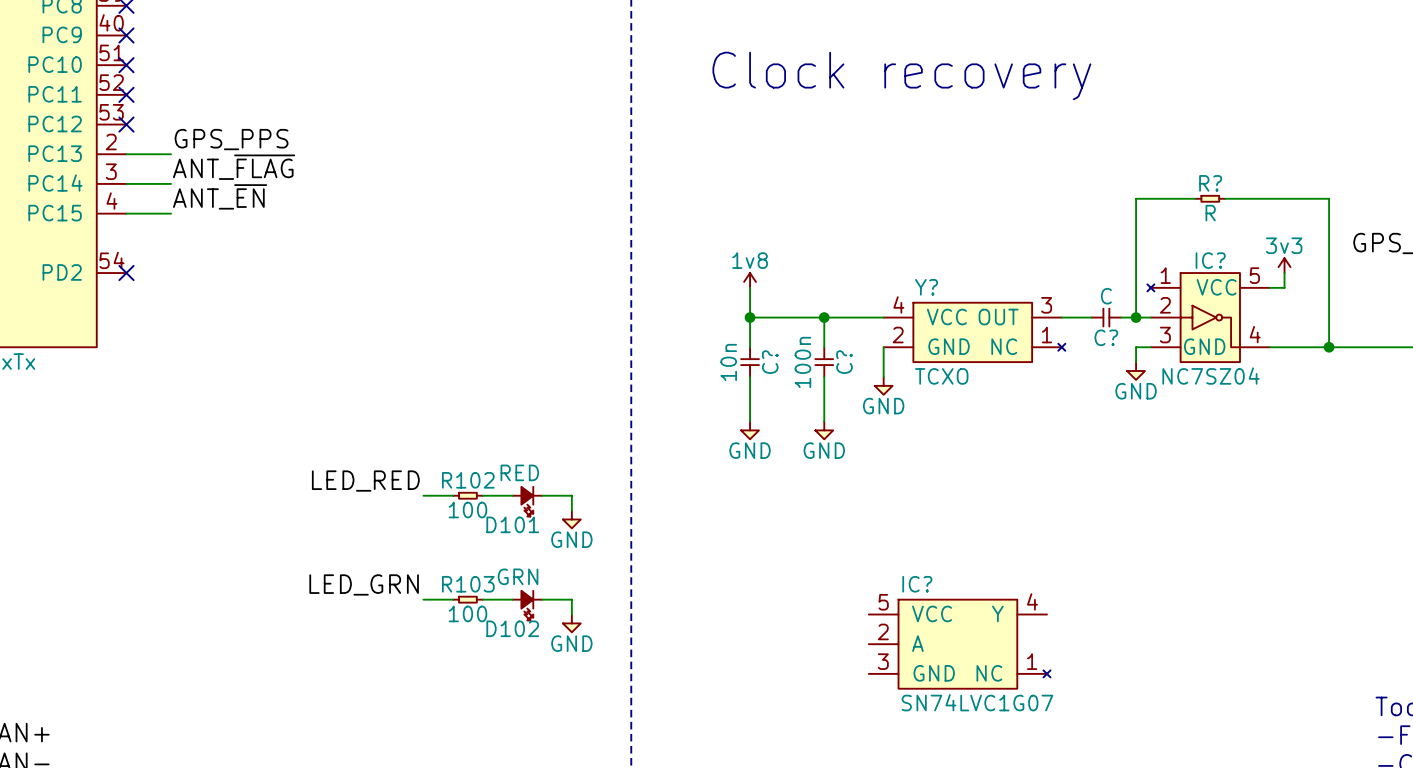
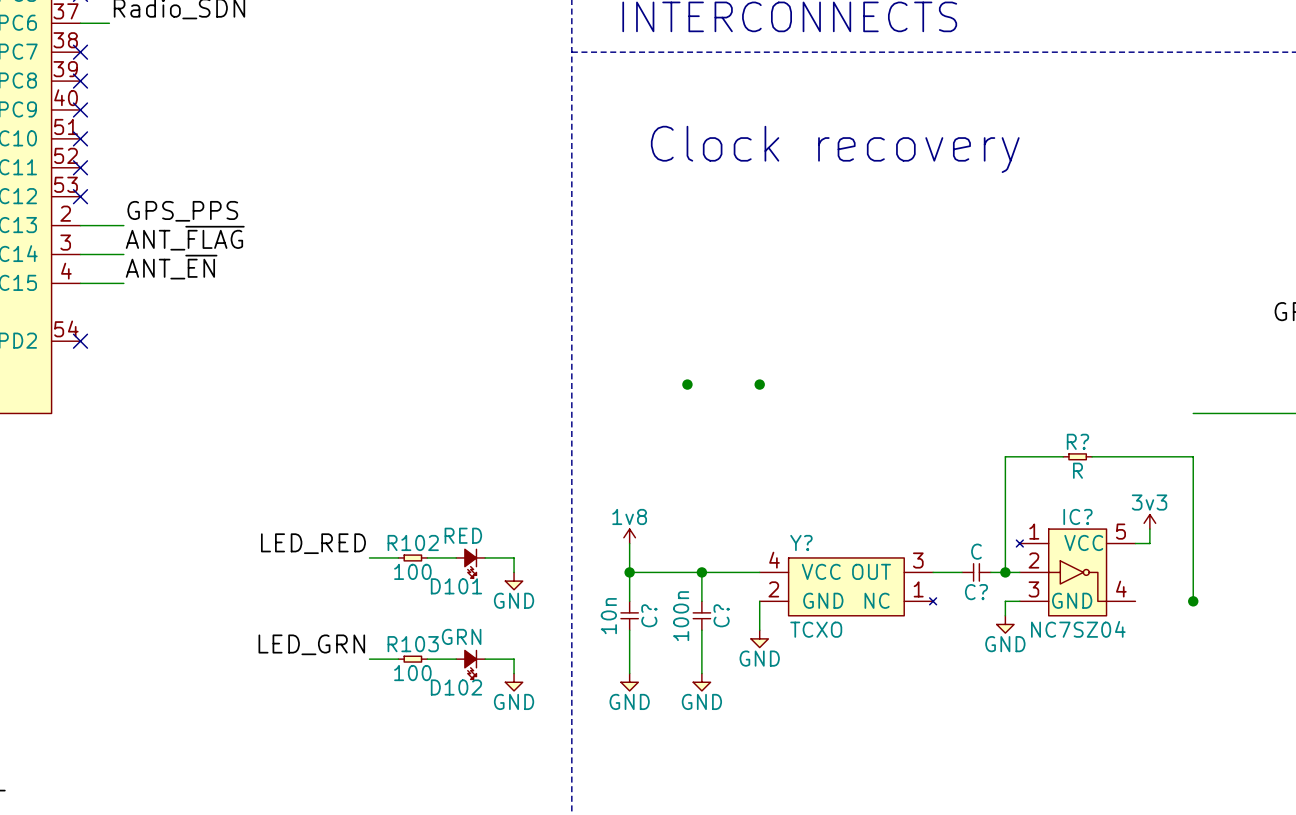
wire: (1195, 198) (1136, 198) (1136, 317) -> (1063, 456) (1005, 456) (1005, 572)
R? position: (1210, 198) -> (1077, 456)
wire: (1225, 198) (1329, 198) (1329, 347) -> (1092, 456) (1193, 456) (1193, 601)
power symbol position: 3v3 (1284, 265) -> 3v3 (1149, 521)
wire: (1284, 273) (1284, 287) (1269, 287) -> (1149, 529) (1149, 543) (1135, 543)
power symbol position: 1v8 (750, 280) -> 1v8 (629, 536)
wire: (750, 287) (750, 347) -> (629, 543) (629, 601)
wire: (750, 317) (883, 317) -> (629, 572) (759, 572)
wire: (824, 317) (824, 347) -> (701, 572) (701, 601)
wire: (1061, 317) (1091, 317) -> (933, 572) (962, 572)
C? position: (1106, 317) -> (976, 572)
wire: (1121, 317) (1150, 317) -> (990, 572) (1019, 572)
junction: (1136, 317) -> none
IC? position: (1208, 317) -> (1075, 572)
Y? position: (974, 332) -> (848, 586)
wire: (883, 347) (883, 376) -> (759, 601) (759, 630)
wire: (1150, 347) (1136, 347) (1136, 362) -> (1019, 601) (1005, 601) (1005, 615)
junction: (1329, 347) -> none
C? position: (750, 362) -> (629, 615)
C? position: (824, 362) -> (701, 615)
power symbol: GND (1136, 371) -> none
wire: (750, 376) (750, 421) -> (629, 630) (629, 673)
wire: (824, 376) (824, 421) -> (701, 630) (701, 673)
power symbol: GND (883, 385) -> none
power symbol: GND (750, 430) -> none
power symbol: GND (824, 430) -> none
junction: none -> (629, 572)
junction: none -> (701, 572)
junction: none -> (1005, 572)
junction: none -> (1193, 601)
power symbol: none -> GND (1005, 624)
power symbol: none -> GND (759, 638)
power symbol: none -> GND (629, 682)
power symbol: none -> GND (701, 682)
IC?: SN74LVC1G07 (959, 644) -> none

